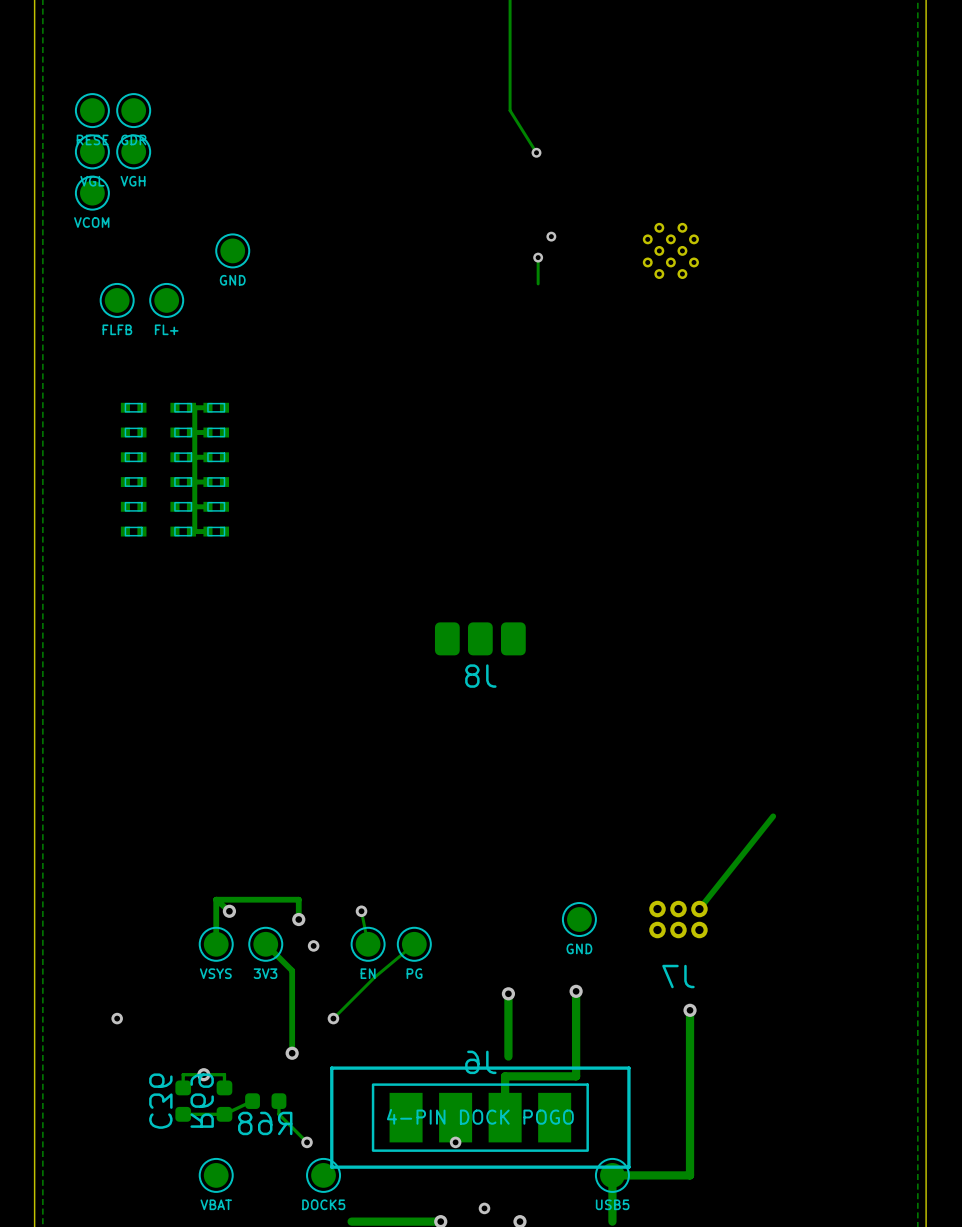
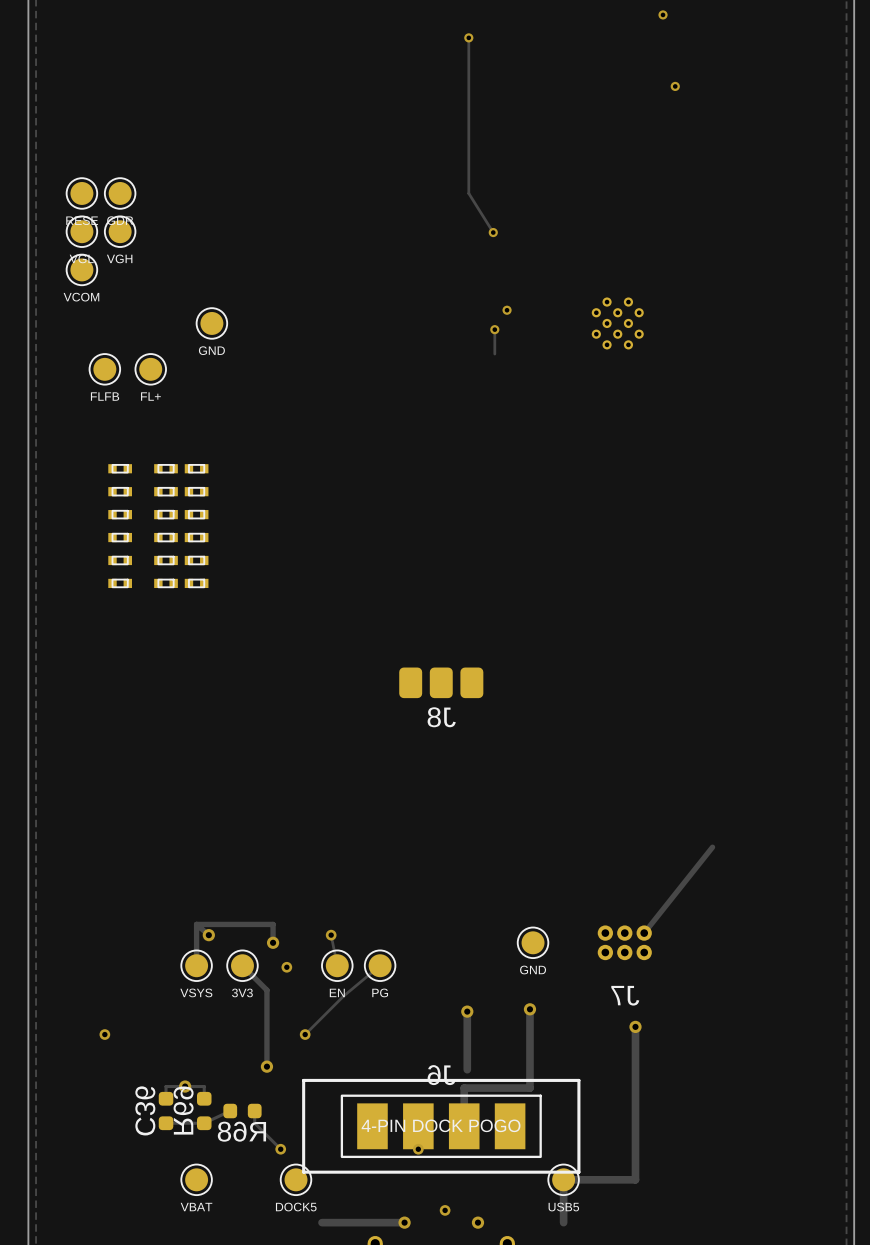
track: (207, 407) (194, 407) (194, 531) (207, 531) -> none
track: (207, 432) (194, 432) -> none
track: (207, 457) (194, 457) -> none
track: (207, 482) (194, 482) -> none
track: (207, 506) (194, 506) -> none

